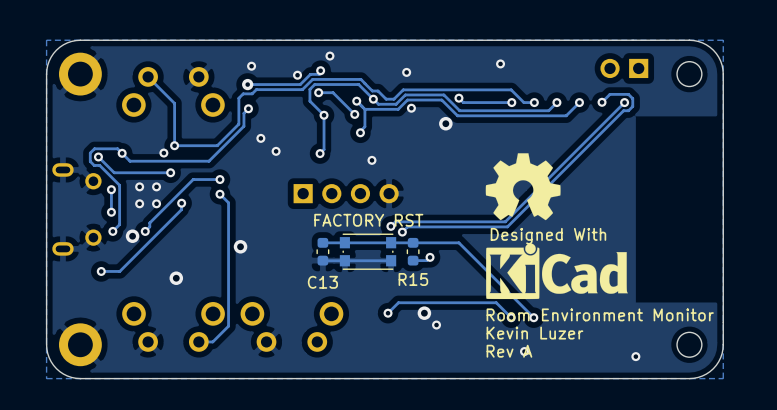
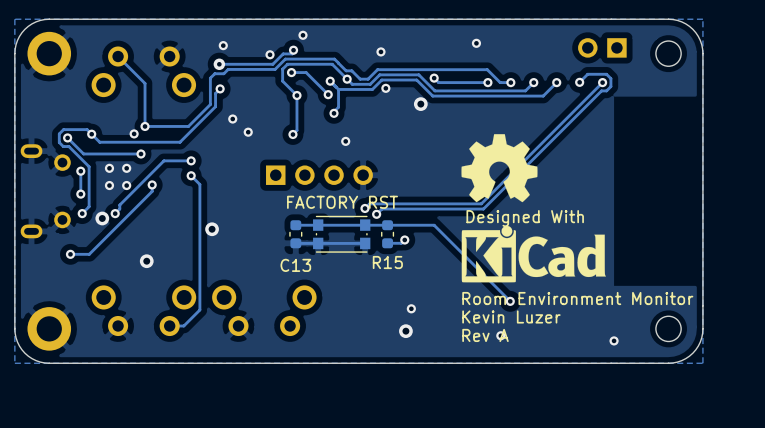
track: (388, 313) (398, 302) (496, 302) (511, 317) -> none
via: (388, 313) -> none
via position: (424, 313) -> (405, 331)
via: (511, 317) -> none

